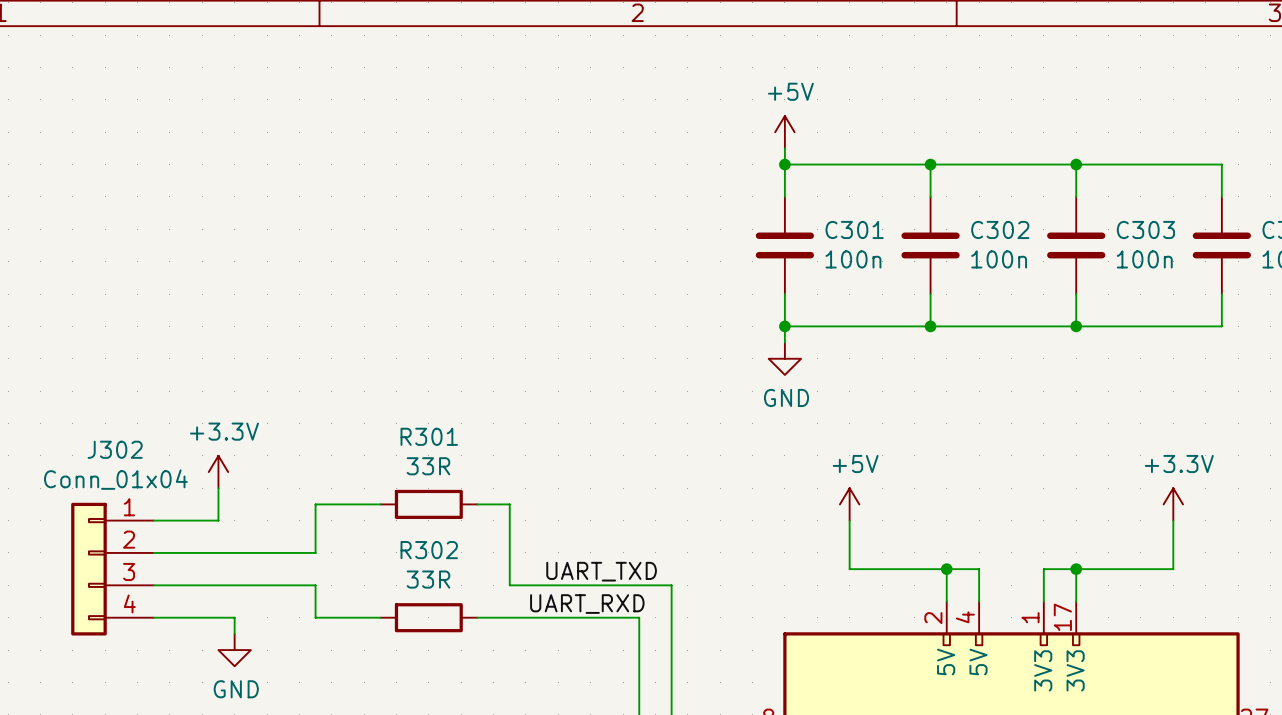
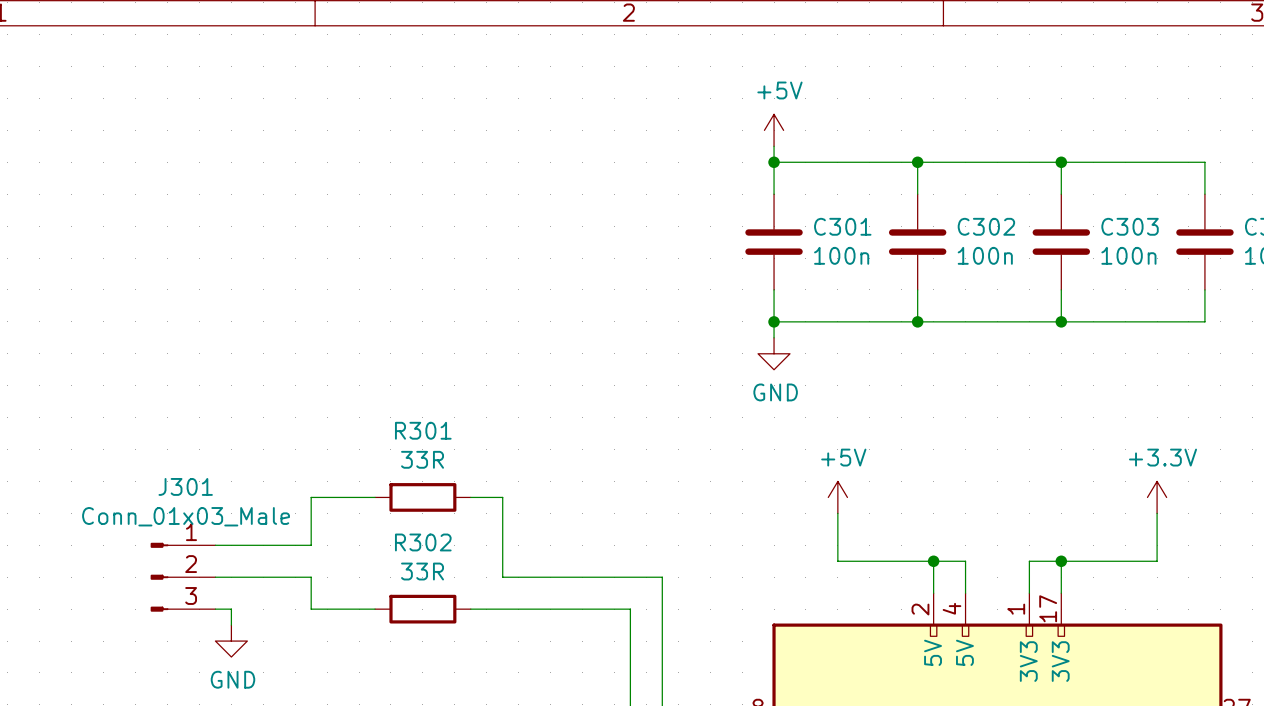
power symbol: +3.3V (218, 472) -> none
wire: (218, 488) (218, 520) (153, 520) -> none
J302: Conn_01x04 (112, 569) -> none
label: UART_TXD (601, 571) -> none
J301: none -> Conn_01x03_Male (183, 577)
label: UART_RXD (587, 604) -> none

